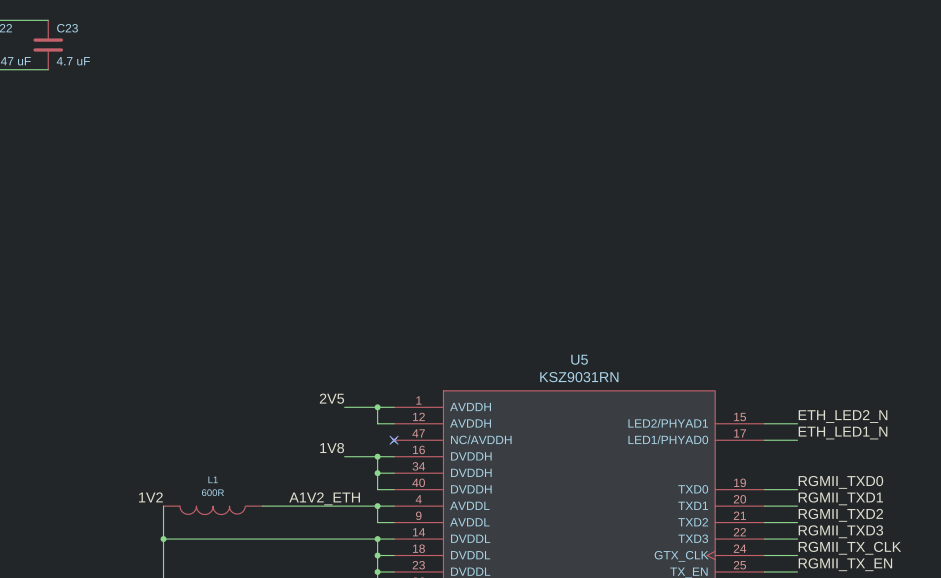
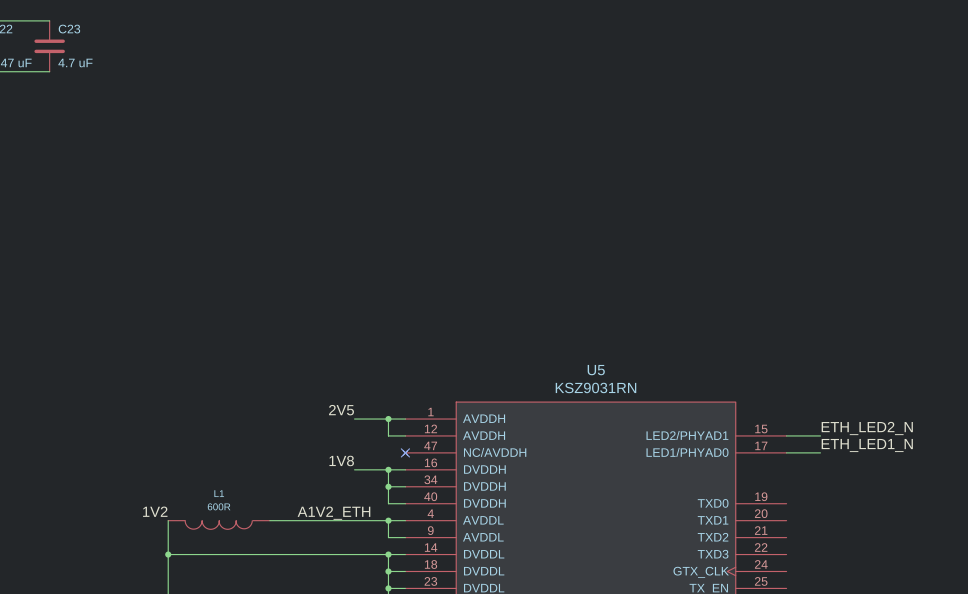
label: RGMII_TXD0 (840, 482) -> none
wire: (764, 489) (797, 489) -> none
label: RGMII_TXD1 (840, 498) -> none
wire: (764, 506) (797, 506) -> none
label: RGMII_TXD2 (840, 515) -> none
wire: (764, 522) (797, 522) -> none
label: RGMII_TXD3 (840, 531) -> none
wire: (764, 539) (797, 539) -> none
label: RGMII_TX_CLK (849, 548) -> none
wire: (764, 555) (797, 555) -> none
label: RGMII_TX_EN (845, 564) -> none
wire: (764, 571) (797, 571) -> none

